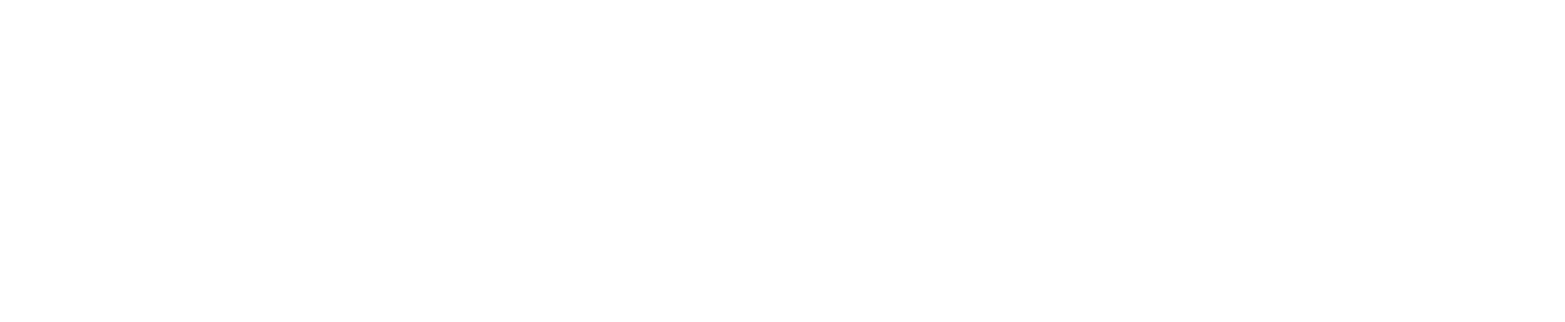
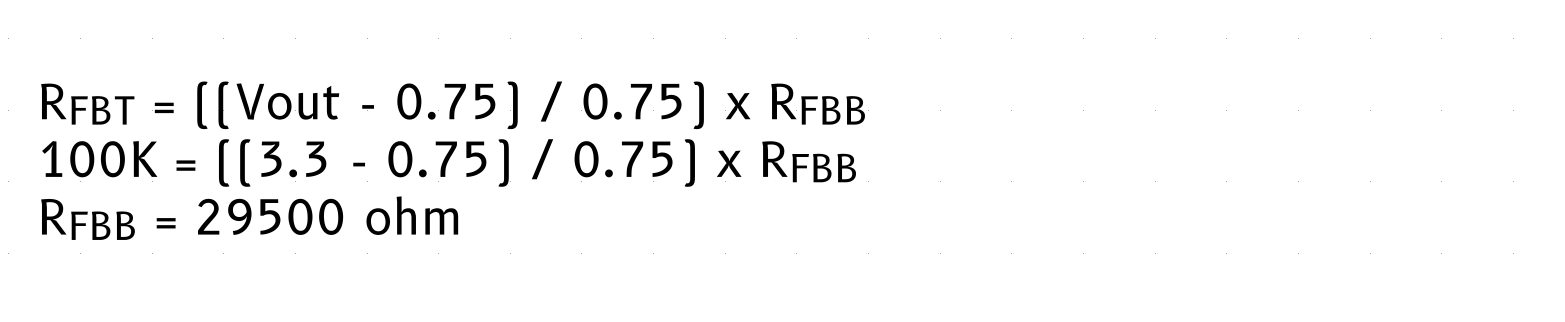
text: none -> RFBT = ((Vout - 0.75) / 0.75) x RFBB (453, 105)
text: none -> 100K = ((3.3 - 0.75) / 0.75) x RFBB (449, 163)
text: none -> RFBB = 29500 ohm (249, 218)

